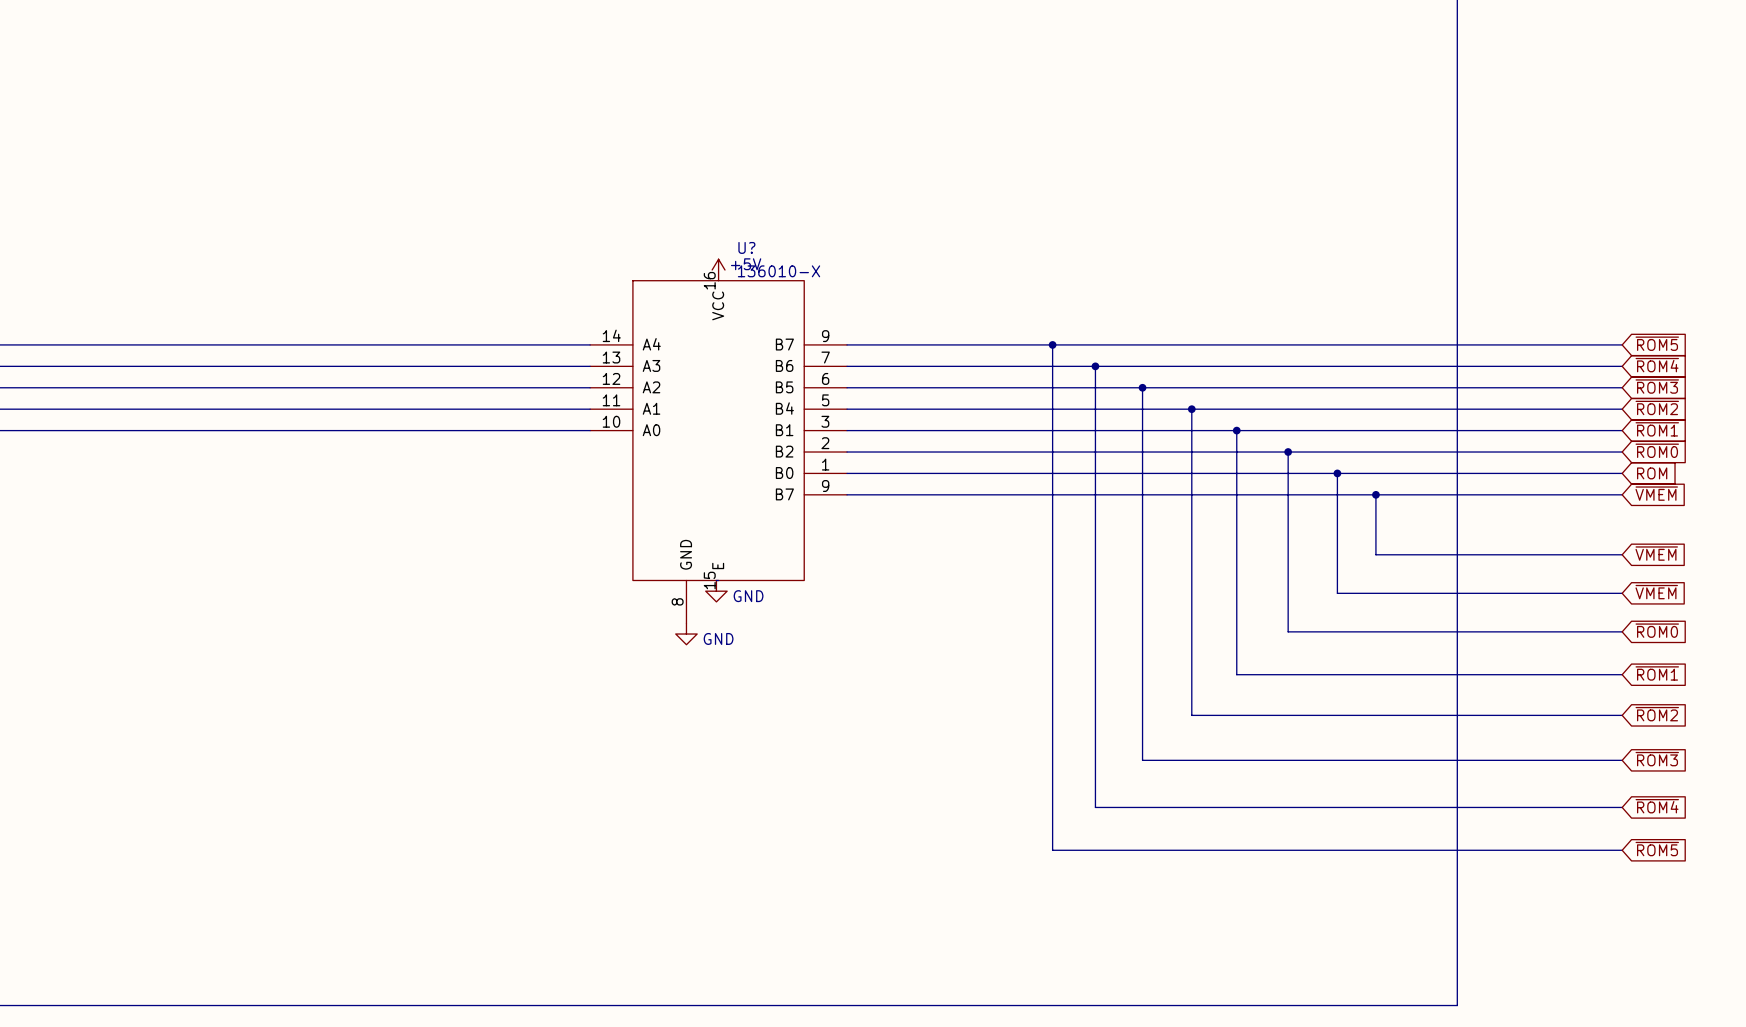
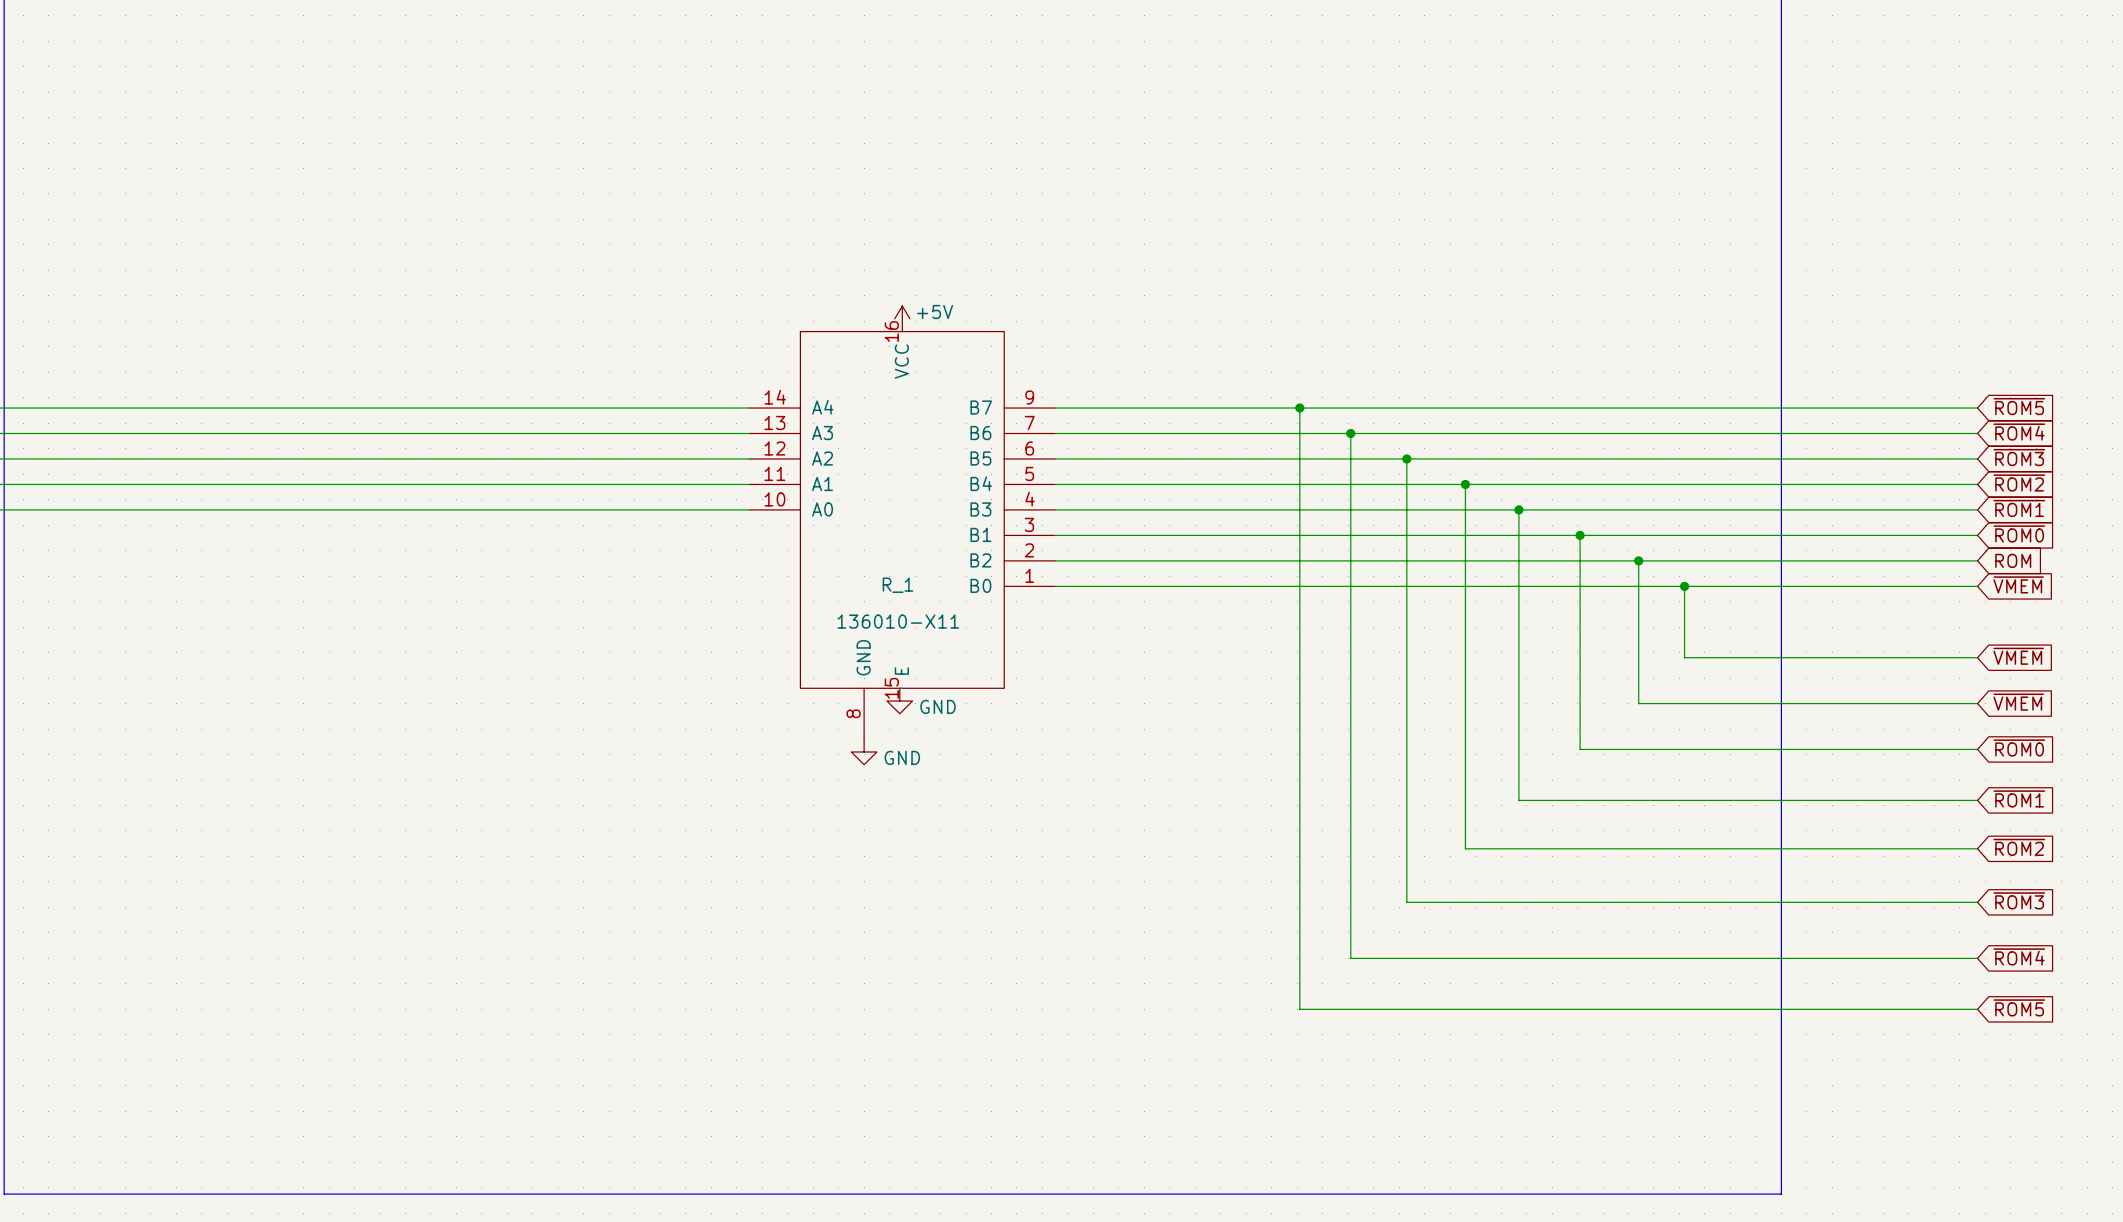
U? name: U? (746, 247) -> R_1 (898, 585)
U? value: 136010-X (779, 271) -> 136010-X11 (898, 621)
U? pin number: 3 (825, 421) -> 4 (1030, 499)
U? pin name: B1 (784, 430) -> B3 (980, 509)
U? pin number: 2 (825, 443) -> 3 (1029, 524)
U? pin name: B2 (784, 451) -> B1 (980, 534)
U? pin number: 1 (825, 464) -> 2 (1029, 550)
U? pin name: B0 (784, 473) -> B2 (980, 560)
U? pin number: 9 (825, 486) -> 1 (1029, 575)
U? pin name: B7 (784, 494) -> B0 (980, 585)

